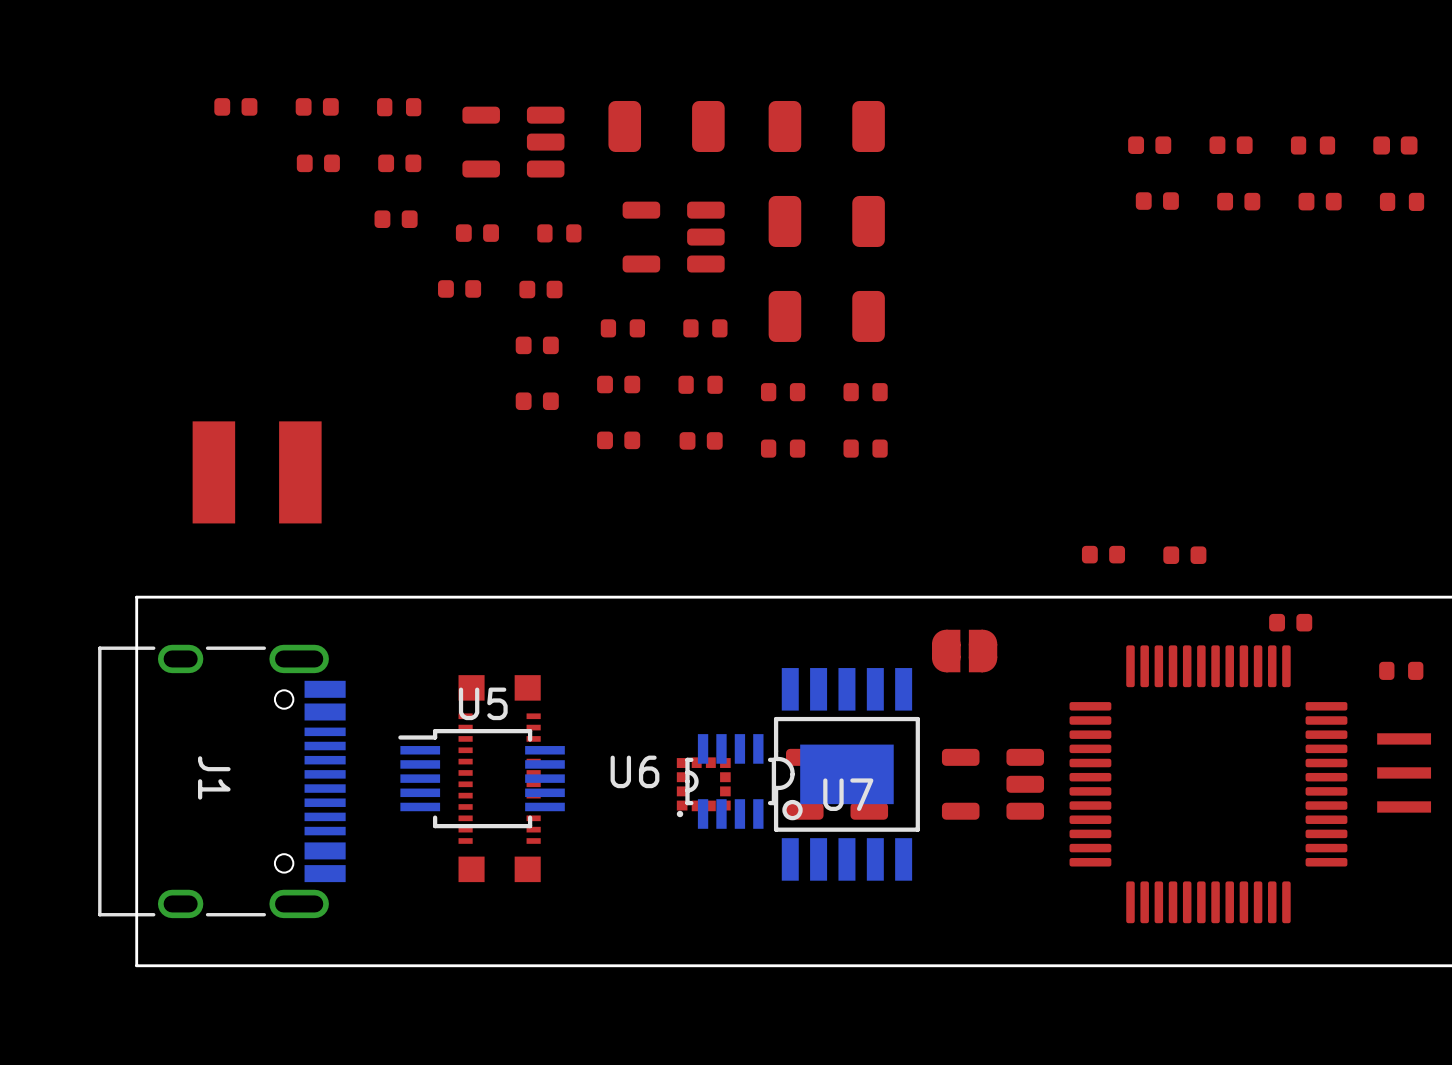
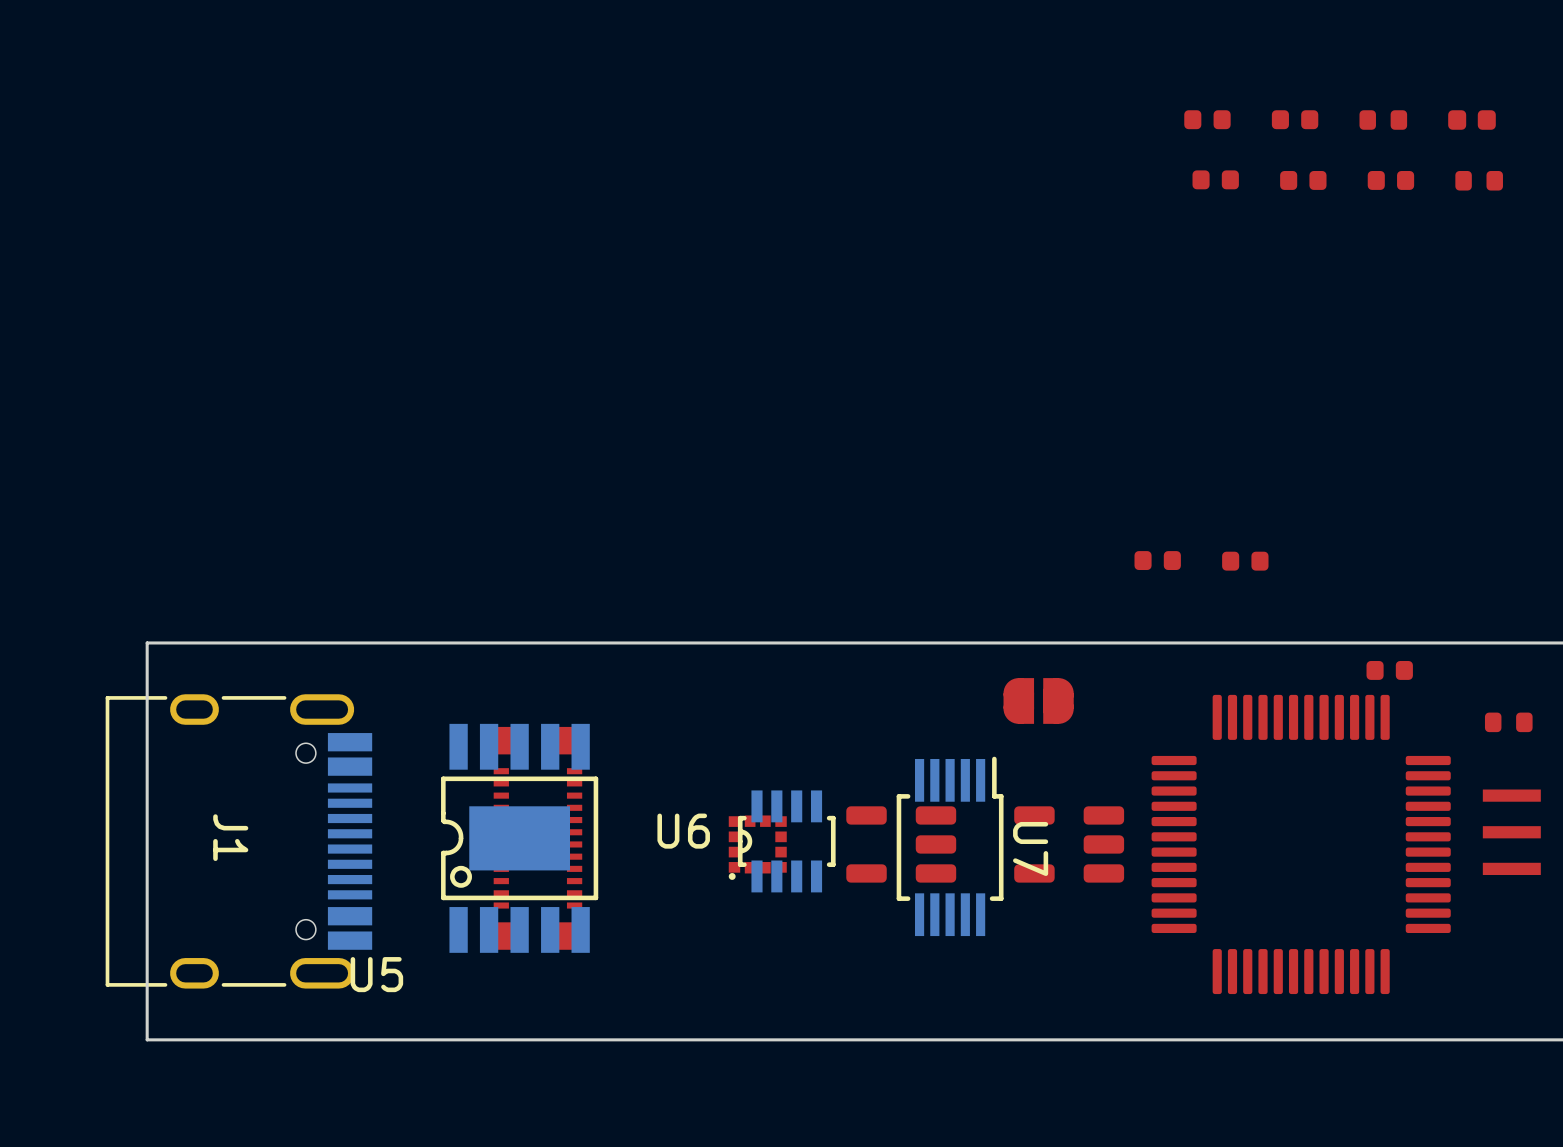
part: (235, 106) -> none
part: (317, 106) -> none
part: (399, 107) -> none
part: none -> (1207, 119)
part: none -> (1295, 119)
part: none -> (1383, 120)
part: (666, 126) -> none
part: (826, 126) -> none
part: (513, 142) -> none
part: (1149, 145) -> none
part: (1231, 145) -> none
part: (1313, 145) -> none
part position: (1395, 145) -> (1471, 120)
part: (318, 163) -> none
part: (399, 163) -> none
part: none -> (1215, 179)
part: none -> (1303, 180)
part: none -> (1390, 180)
part: none -> (1479, 180)
part: (1157, 201) -> none
part: (1238, 201) -> none
part: (1320, 201) -> none
part: (1402, 201) -> none
part: (396, 219) -> none
part: (826, 221) -> none
part: (477, 233) -> none
part: (559, 233) -> none
part: (673, 237) -> none
part: (459, 288) -> none
part: (540, 289) -> none
part: (826, 316) -> none
part: (622, 328) -> none
part: (705, 328) -> none
part: (537, 345) -> none
part: (618, 384) -> none
part: (700, 384) -> none
part: (783, 392) -> none
part: (865, 392) -> none
part: (537, 401) -> none
part: (618, 440) -> none
part: (701, 440) -> none
part: (783, 448) -> none
part: (865, 448) -> none
part: (257, 472) -> none
part: none -> (1157, 560)
part: none -> (1245, 561)
part: (1103, 554) -> none
part: (1184, 555) -> none
U7 footprint: [773, 668, 920, 881] -> [896, 756, 1004, 937]
U5 name position: U5 (483, 703) -> U5 (376, 974)
U5 footprint: [398, 729, 565, 829] -> [441, 723, 599, 953]
U7 name position: U7 (848, 794) -> U7 (1030, 848)

